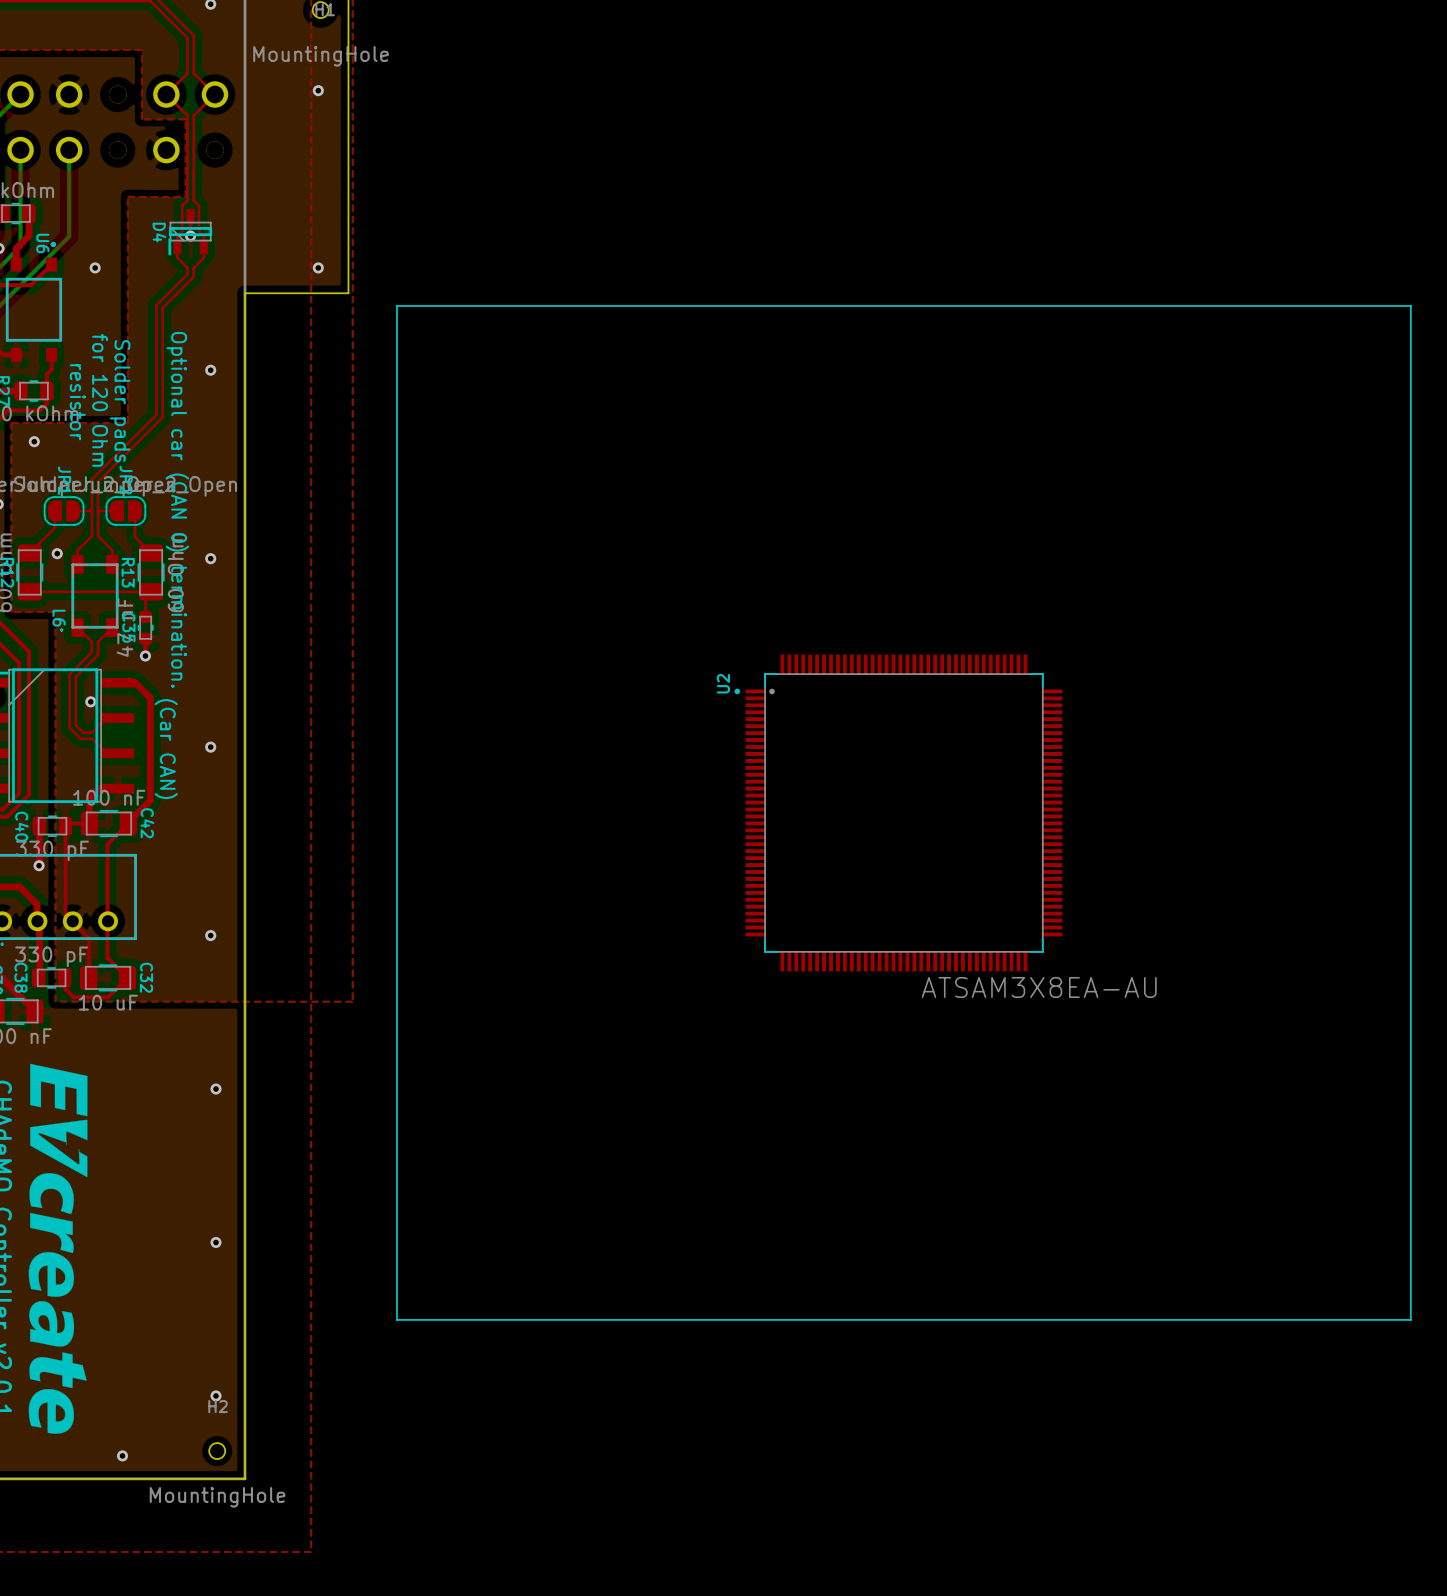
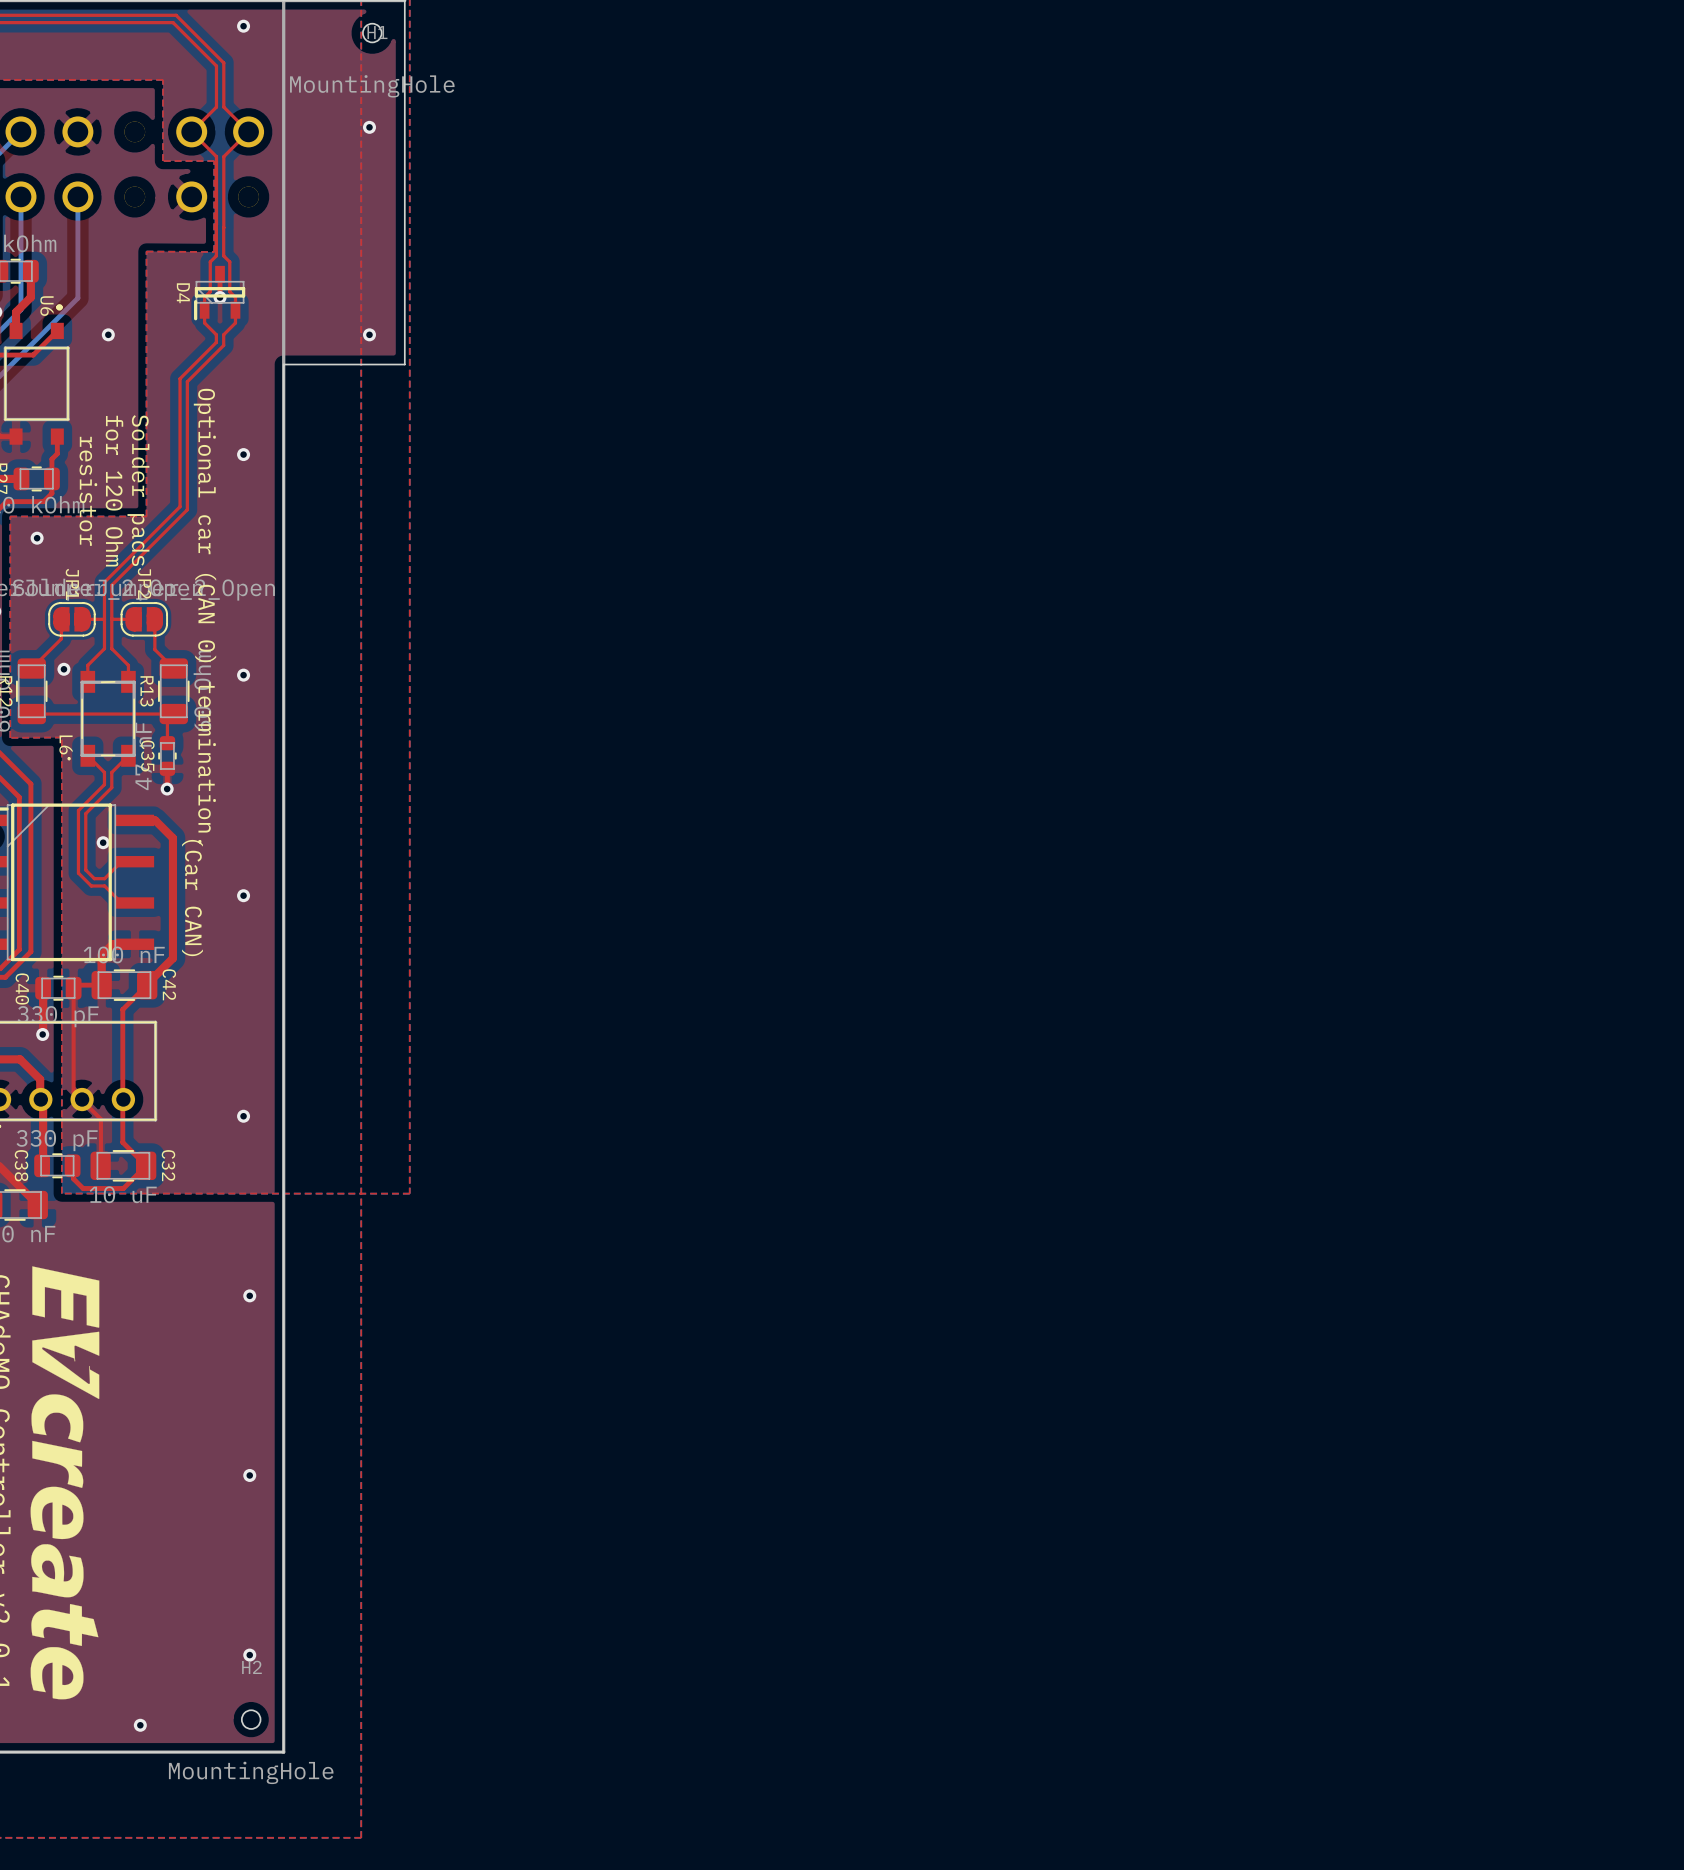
U2: ATSAM3X8EA-AU (903, 812) -> none

